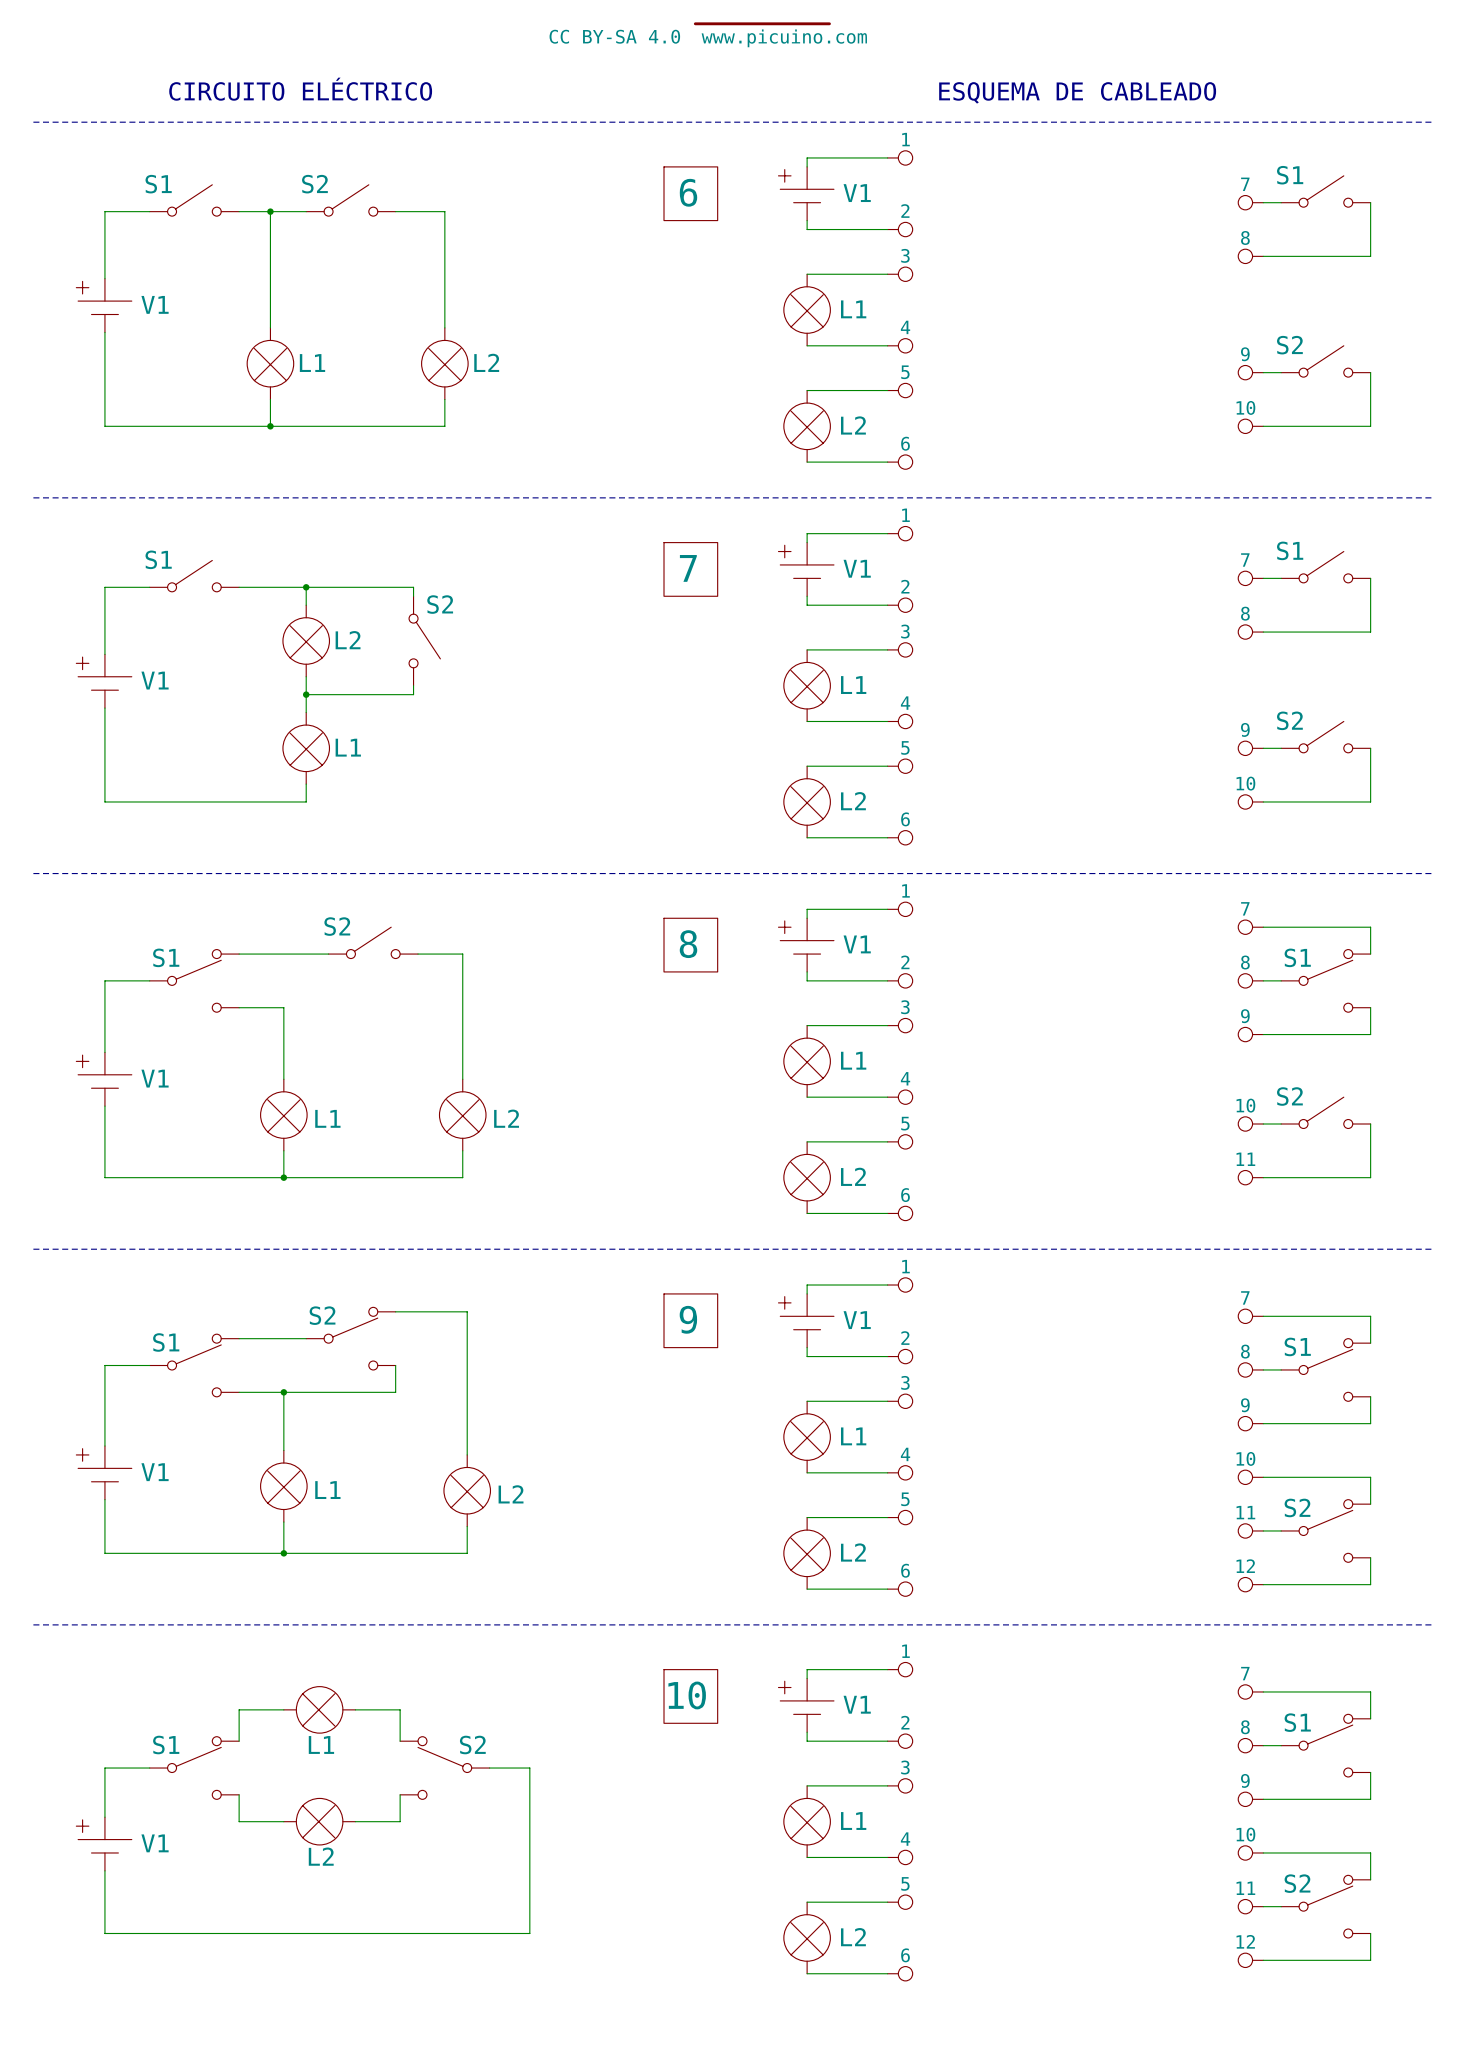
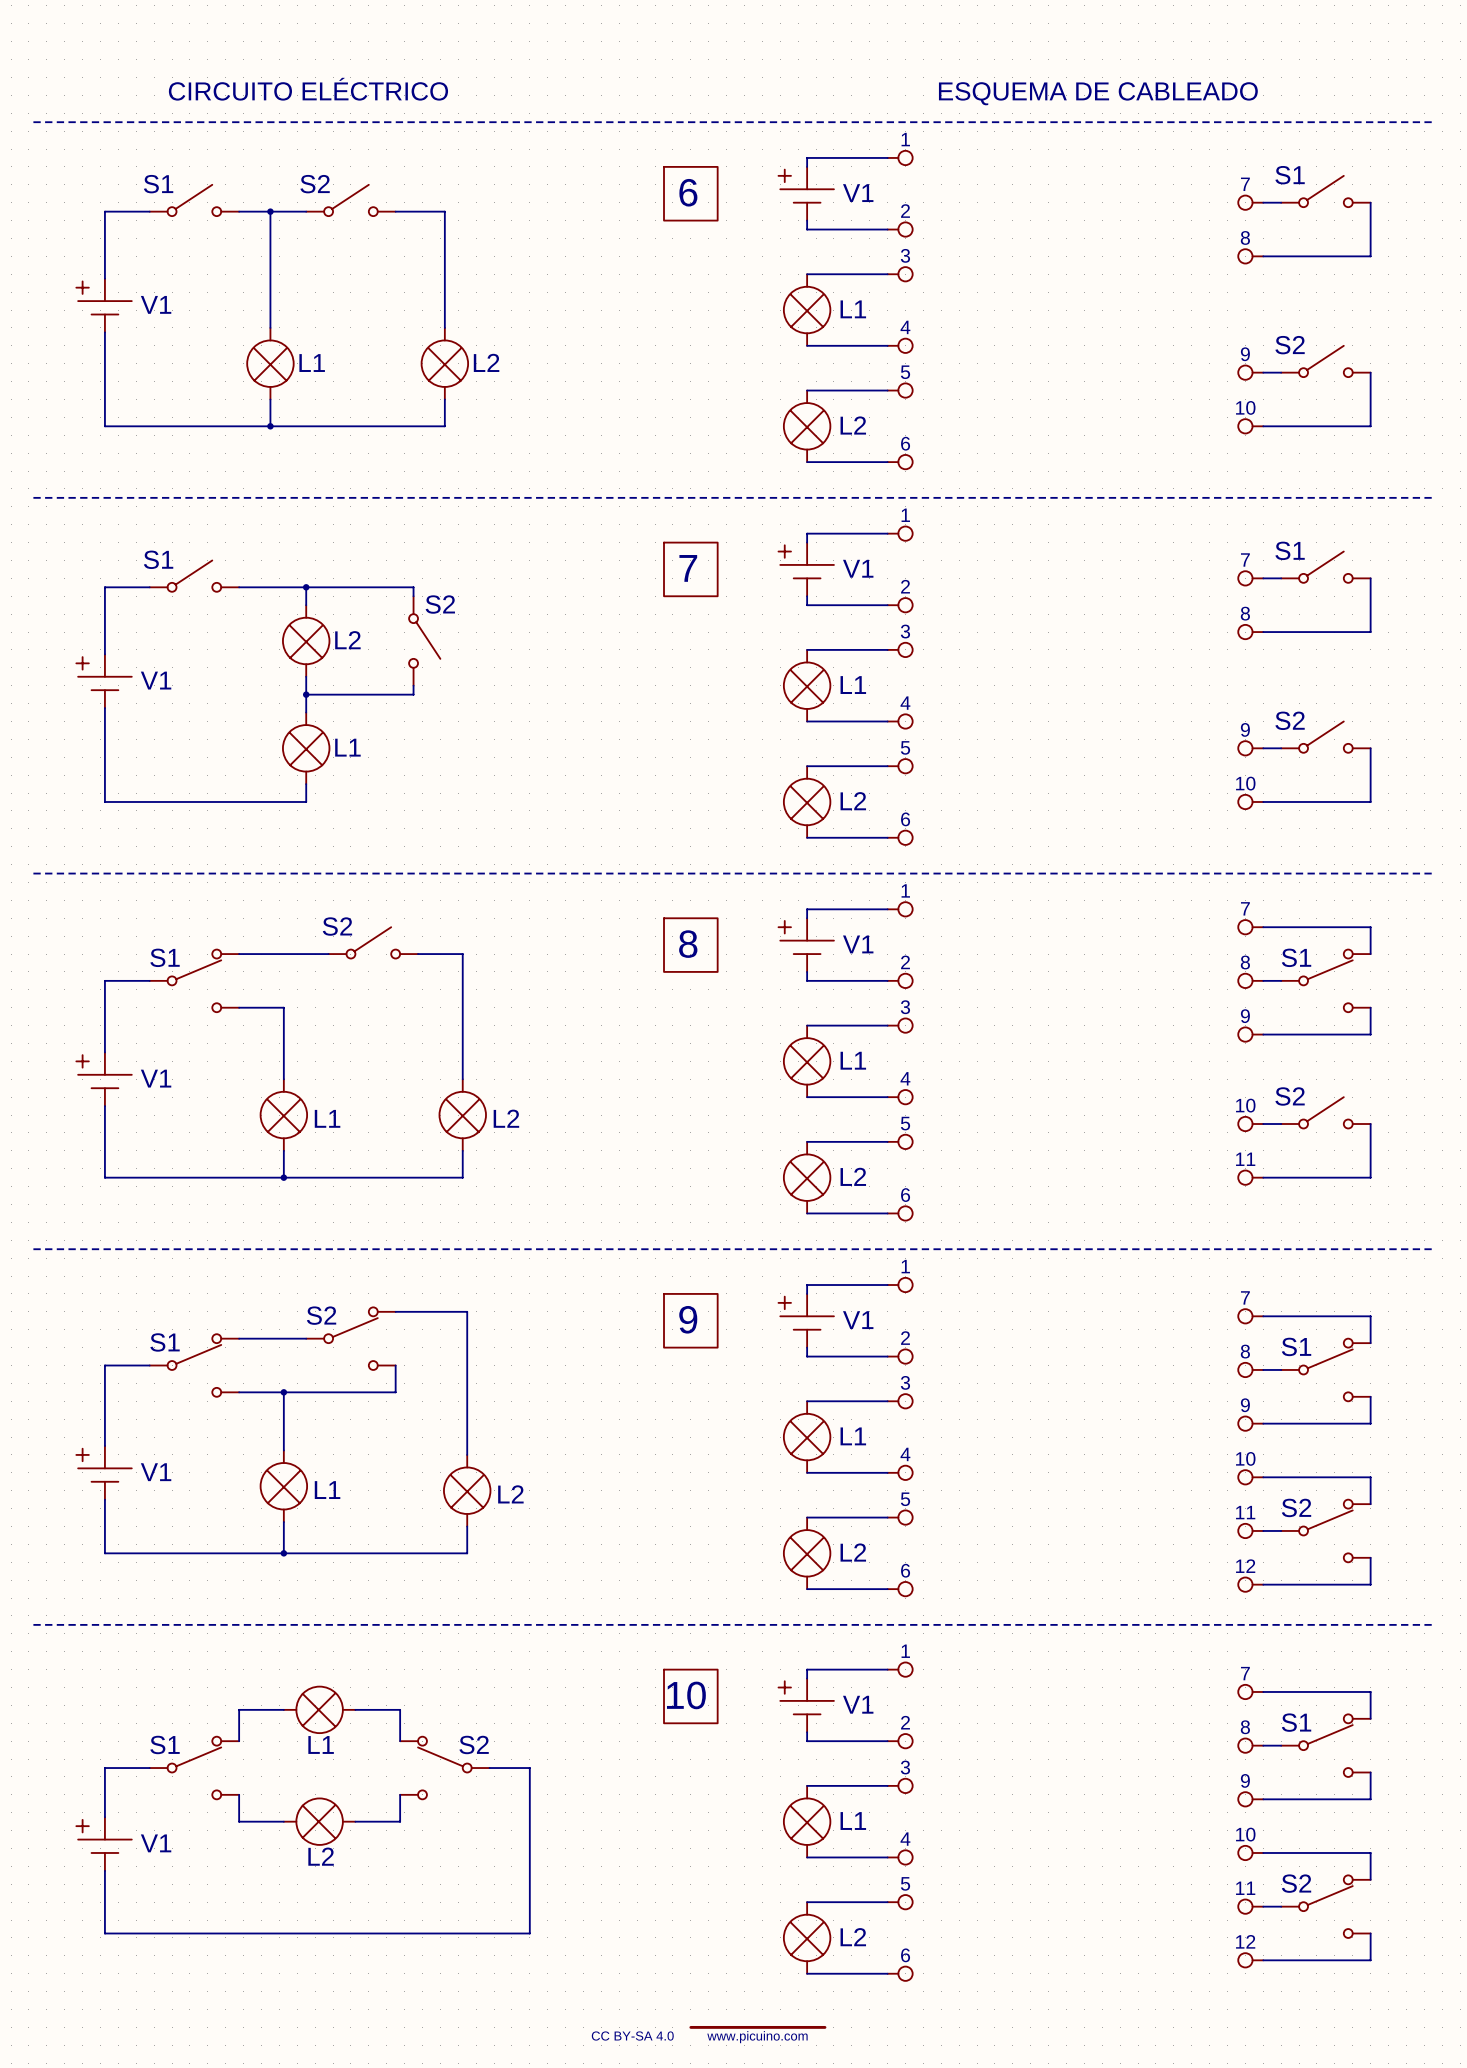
part: (762, 23) -> none
part: none -> (757, 2027)

